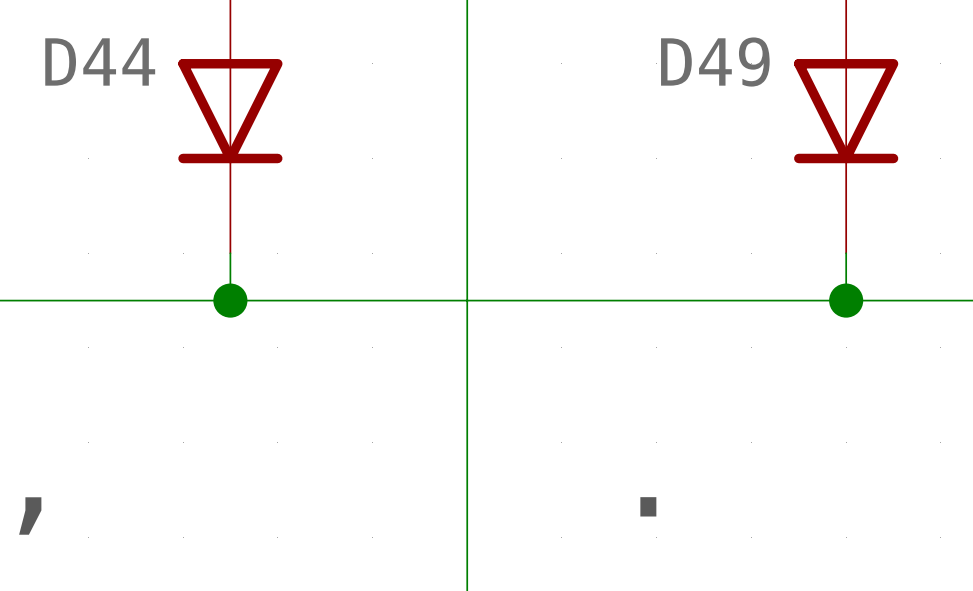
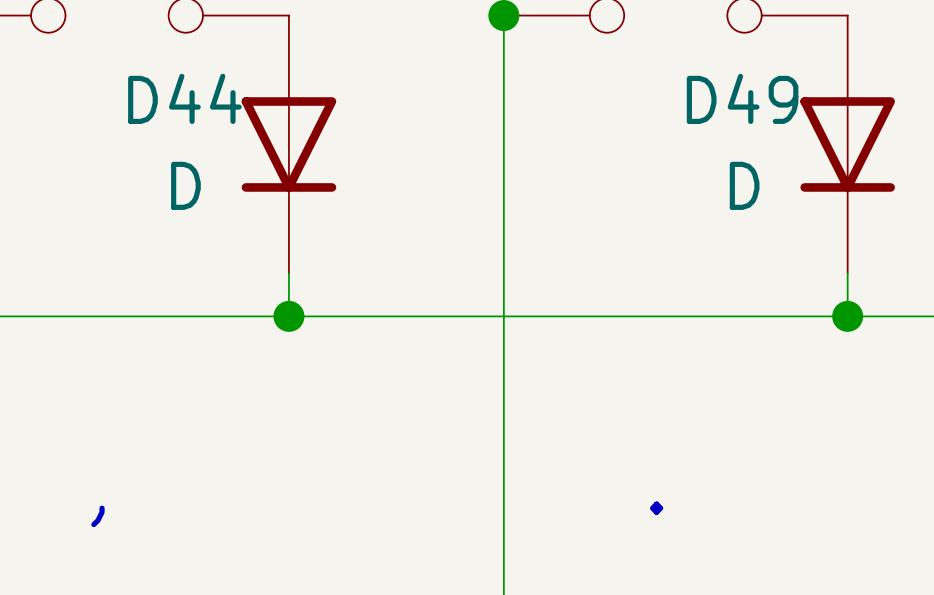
D44 value: none -> D (185, 185)
D49 value: none -> D (744, 185)

